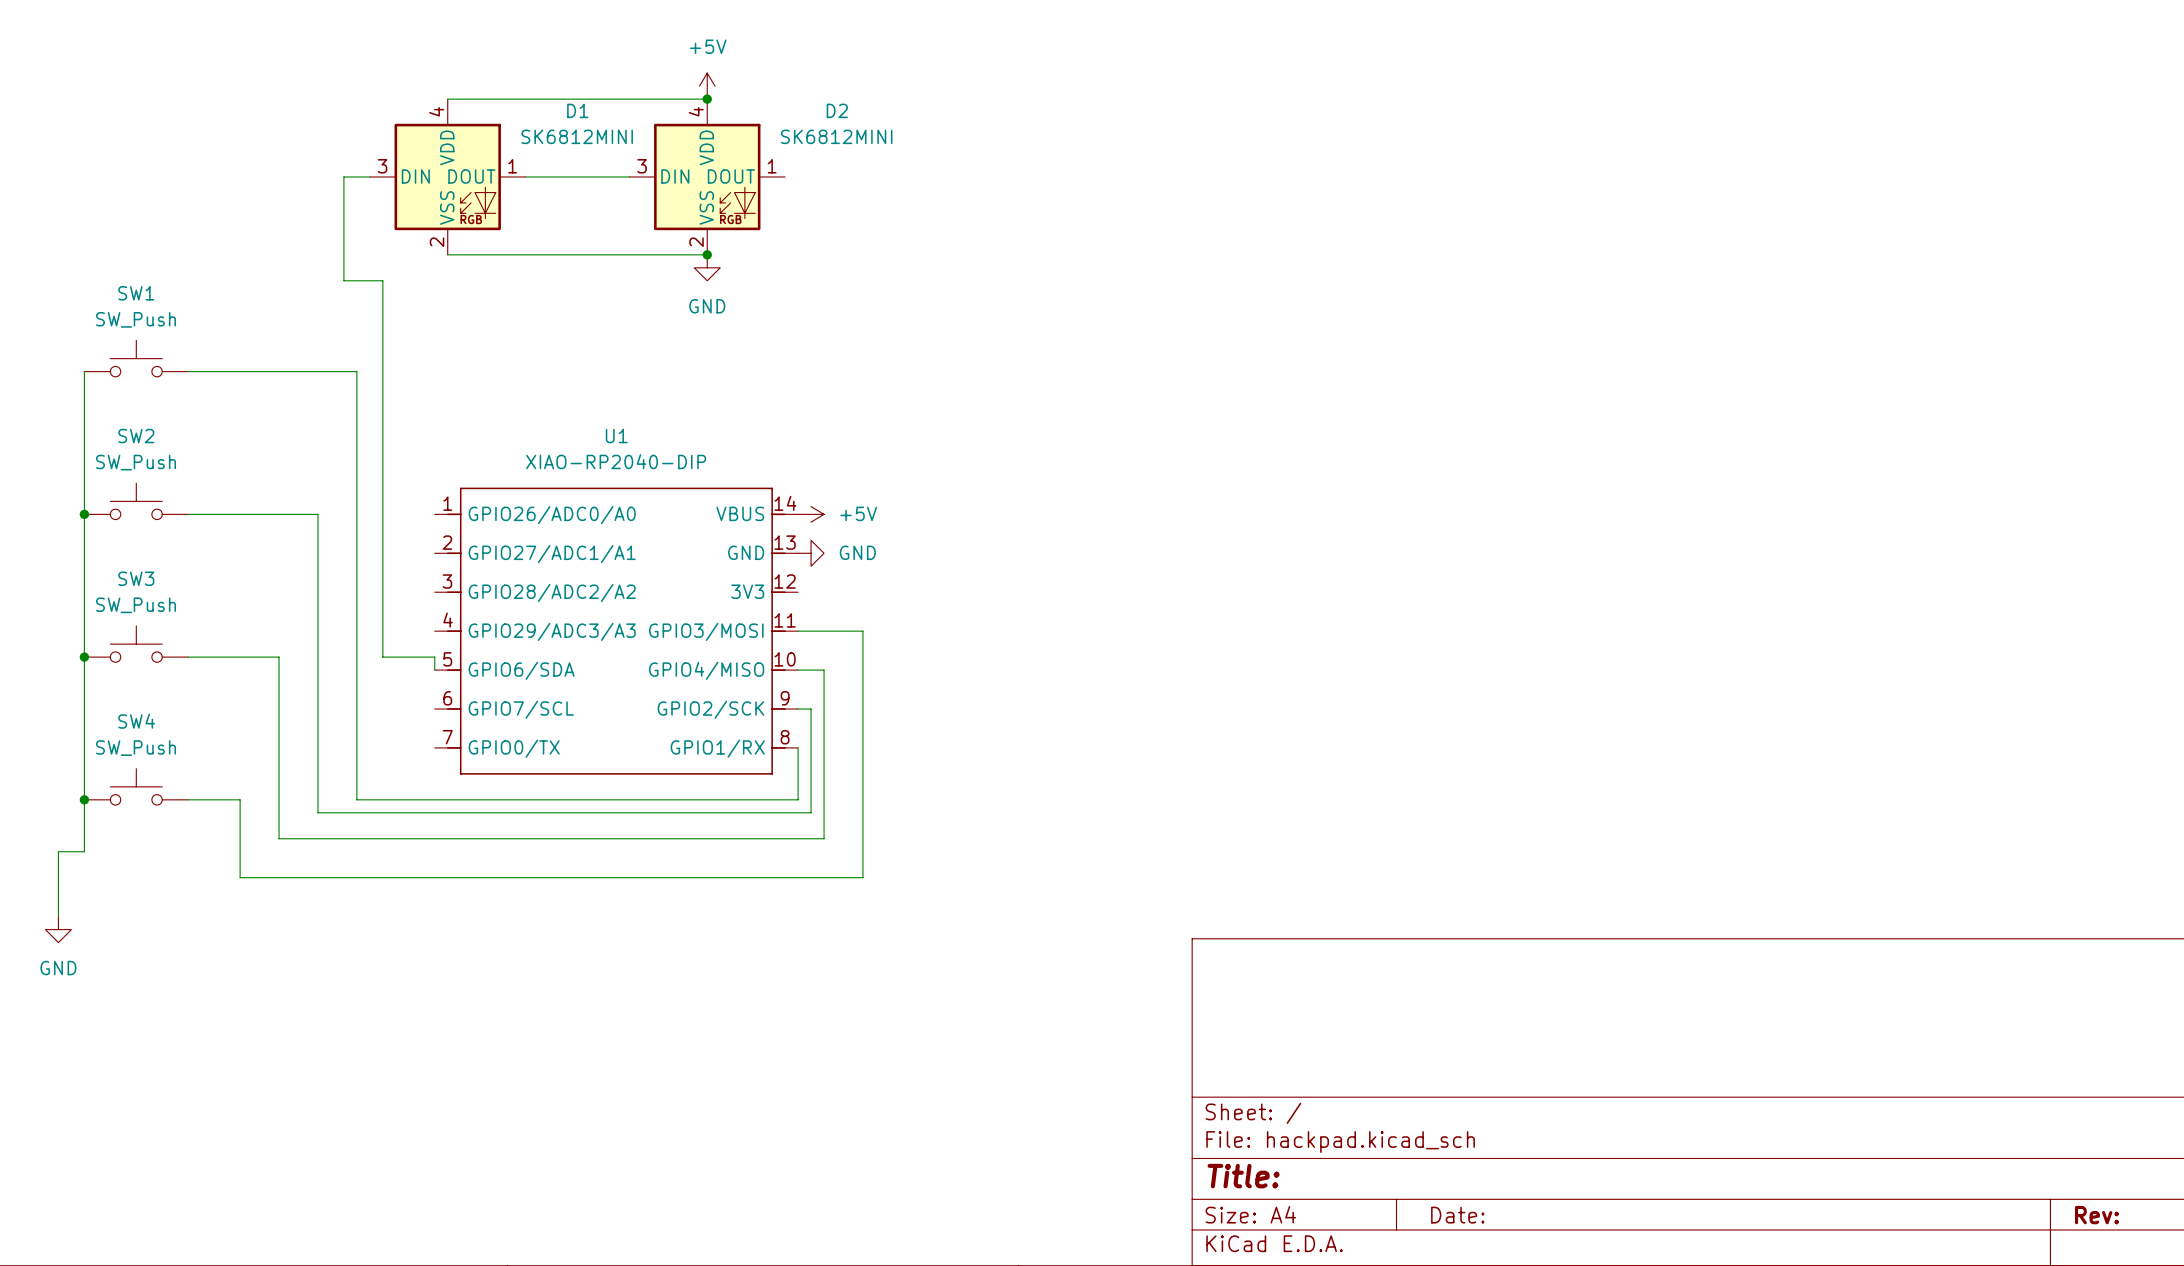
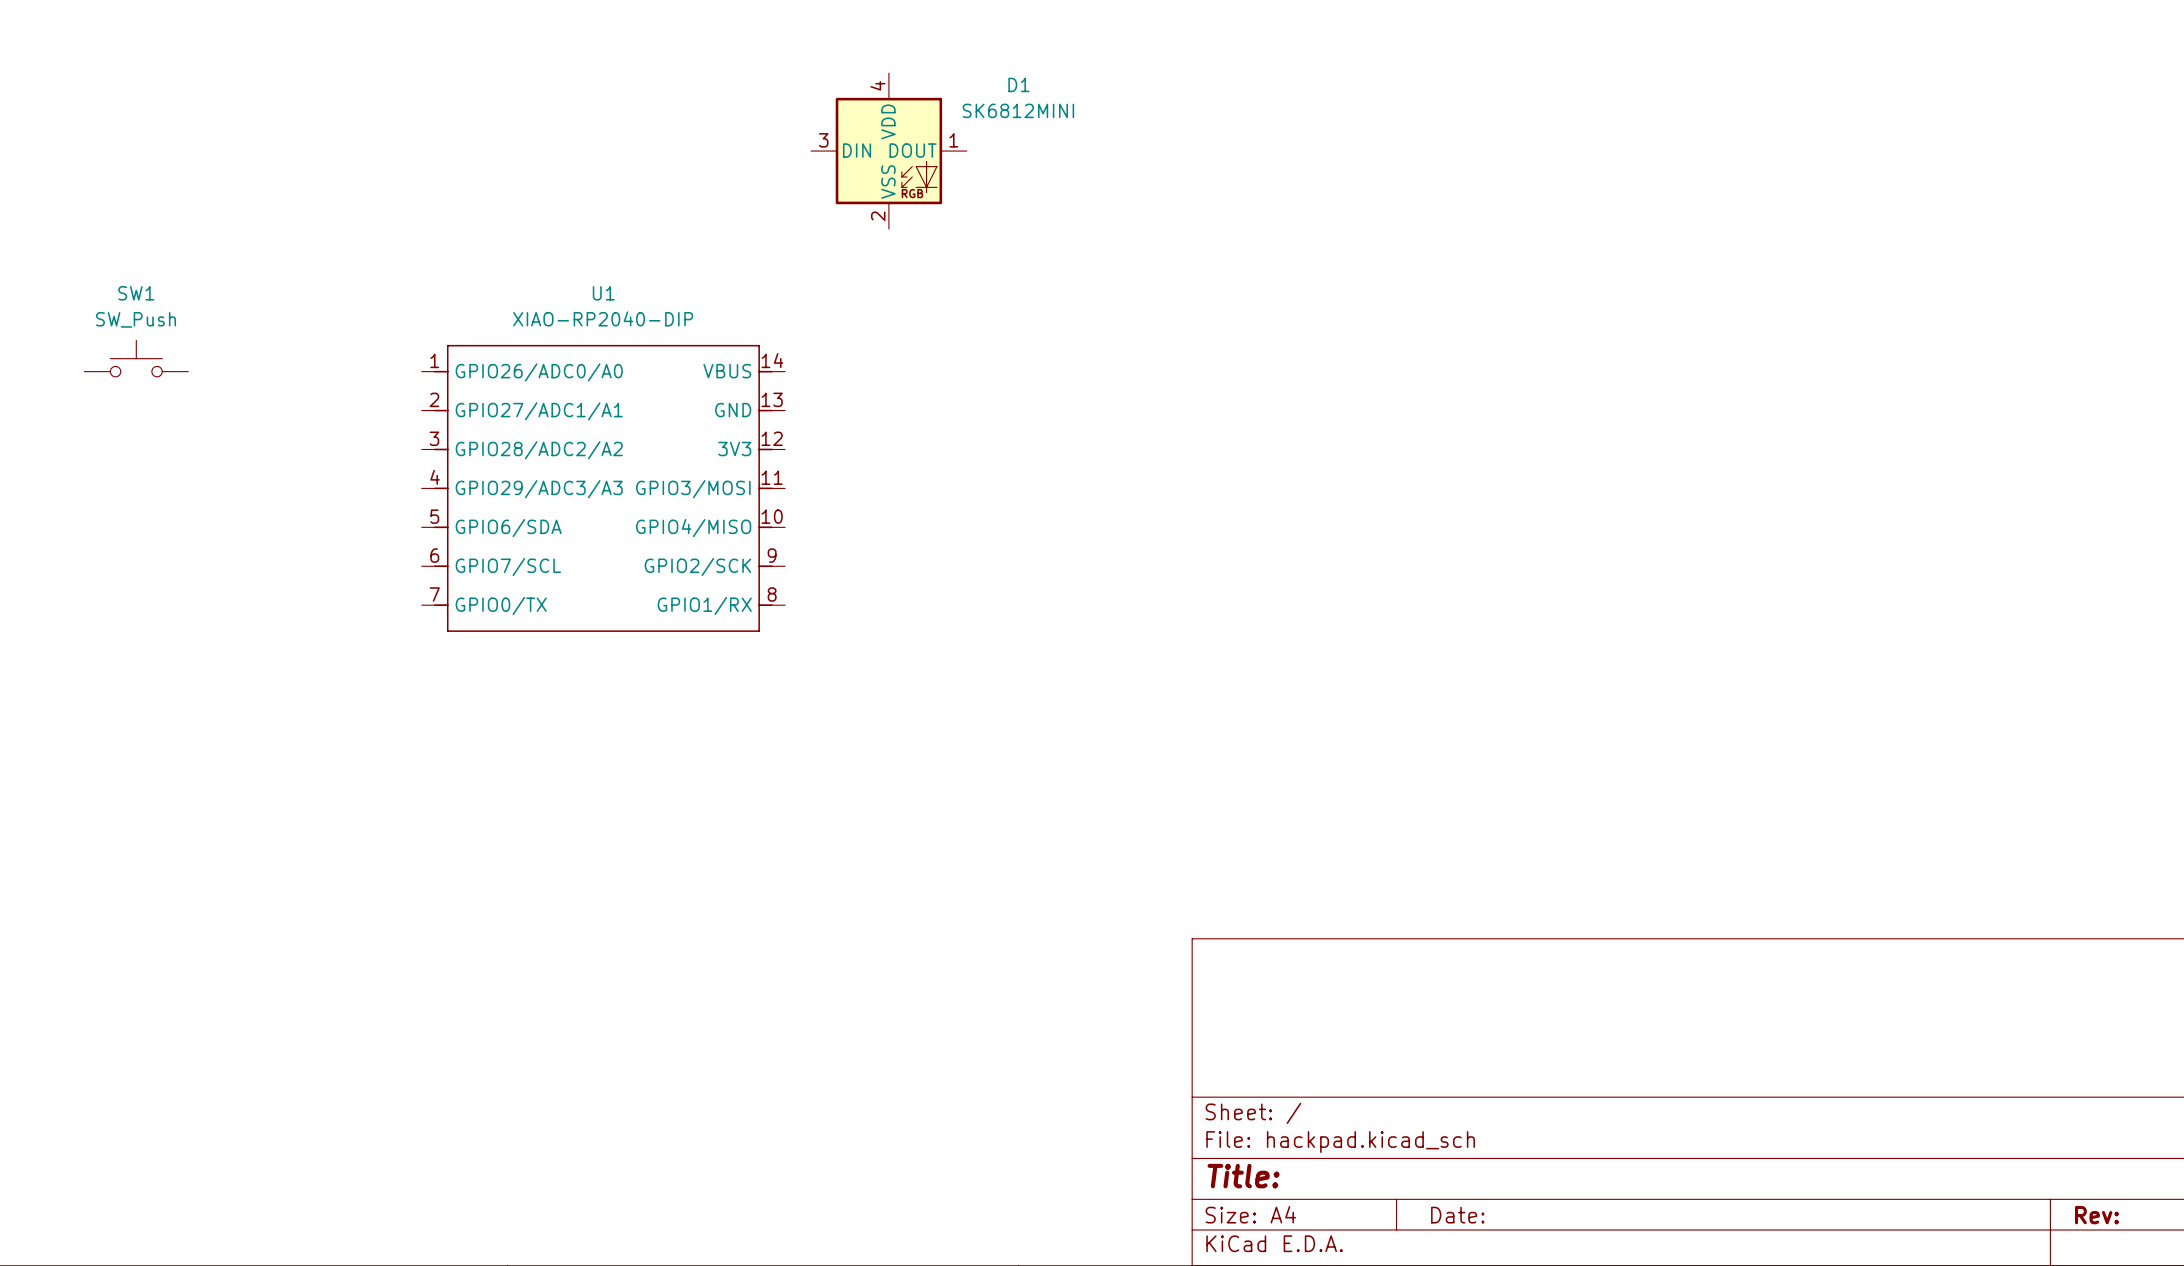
power symbol: +5V (707, 86) -> none
wire: (447, 99) (707, 99) -> none
junction: (707, 99) -> none
wire: (369, 176) (343, 176) (343, 280) (382, 280) (382, 657) (434, 657) (434, 670) -> none
D1 position: (447, 176) -> (888, 151)
wire: (525, 176) (629, 176) -> none
D2: SK6812MINI (707, 176) -> none
wire: (447, 254) (707, 254) -> none
junction: (707, 254) -> none
power symbol: GND (707, 267) -> none
wire: (84, 371) (84, 851) (58, 851) (58, 916) -> none
wire: (188, 371) (356, 371) (356, 799) (798, 799) (798, 747) -> none
SW2: SW_Push (136, 501) -> none
junction: (84, 514) -> none
wire: (188, 514) (317, 514) (317, 812) (811, 812) (811, 709) (798, 709) -> none
power symbol: +5V (811, 514) -> none
power symbol: GND (811, 553) -> none
U1 position: (616, 631) -> (603, 488)
wire: (798, 631) (862, 631) (862, 877) (240, 877) (240, 799) (188, 799) -> none
SW3: SW_Push (136, 644) -> none
junction: (84, 657) -> none
wire: (188, 657) (279, 657) (279, 838) (824, 838) (824, 670) (798, 670) -> none
SW4: SW_Push (136, 786) -> none
junction: (84, 799) -> none
power symbol: GND (58, 929) -> none

